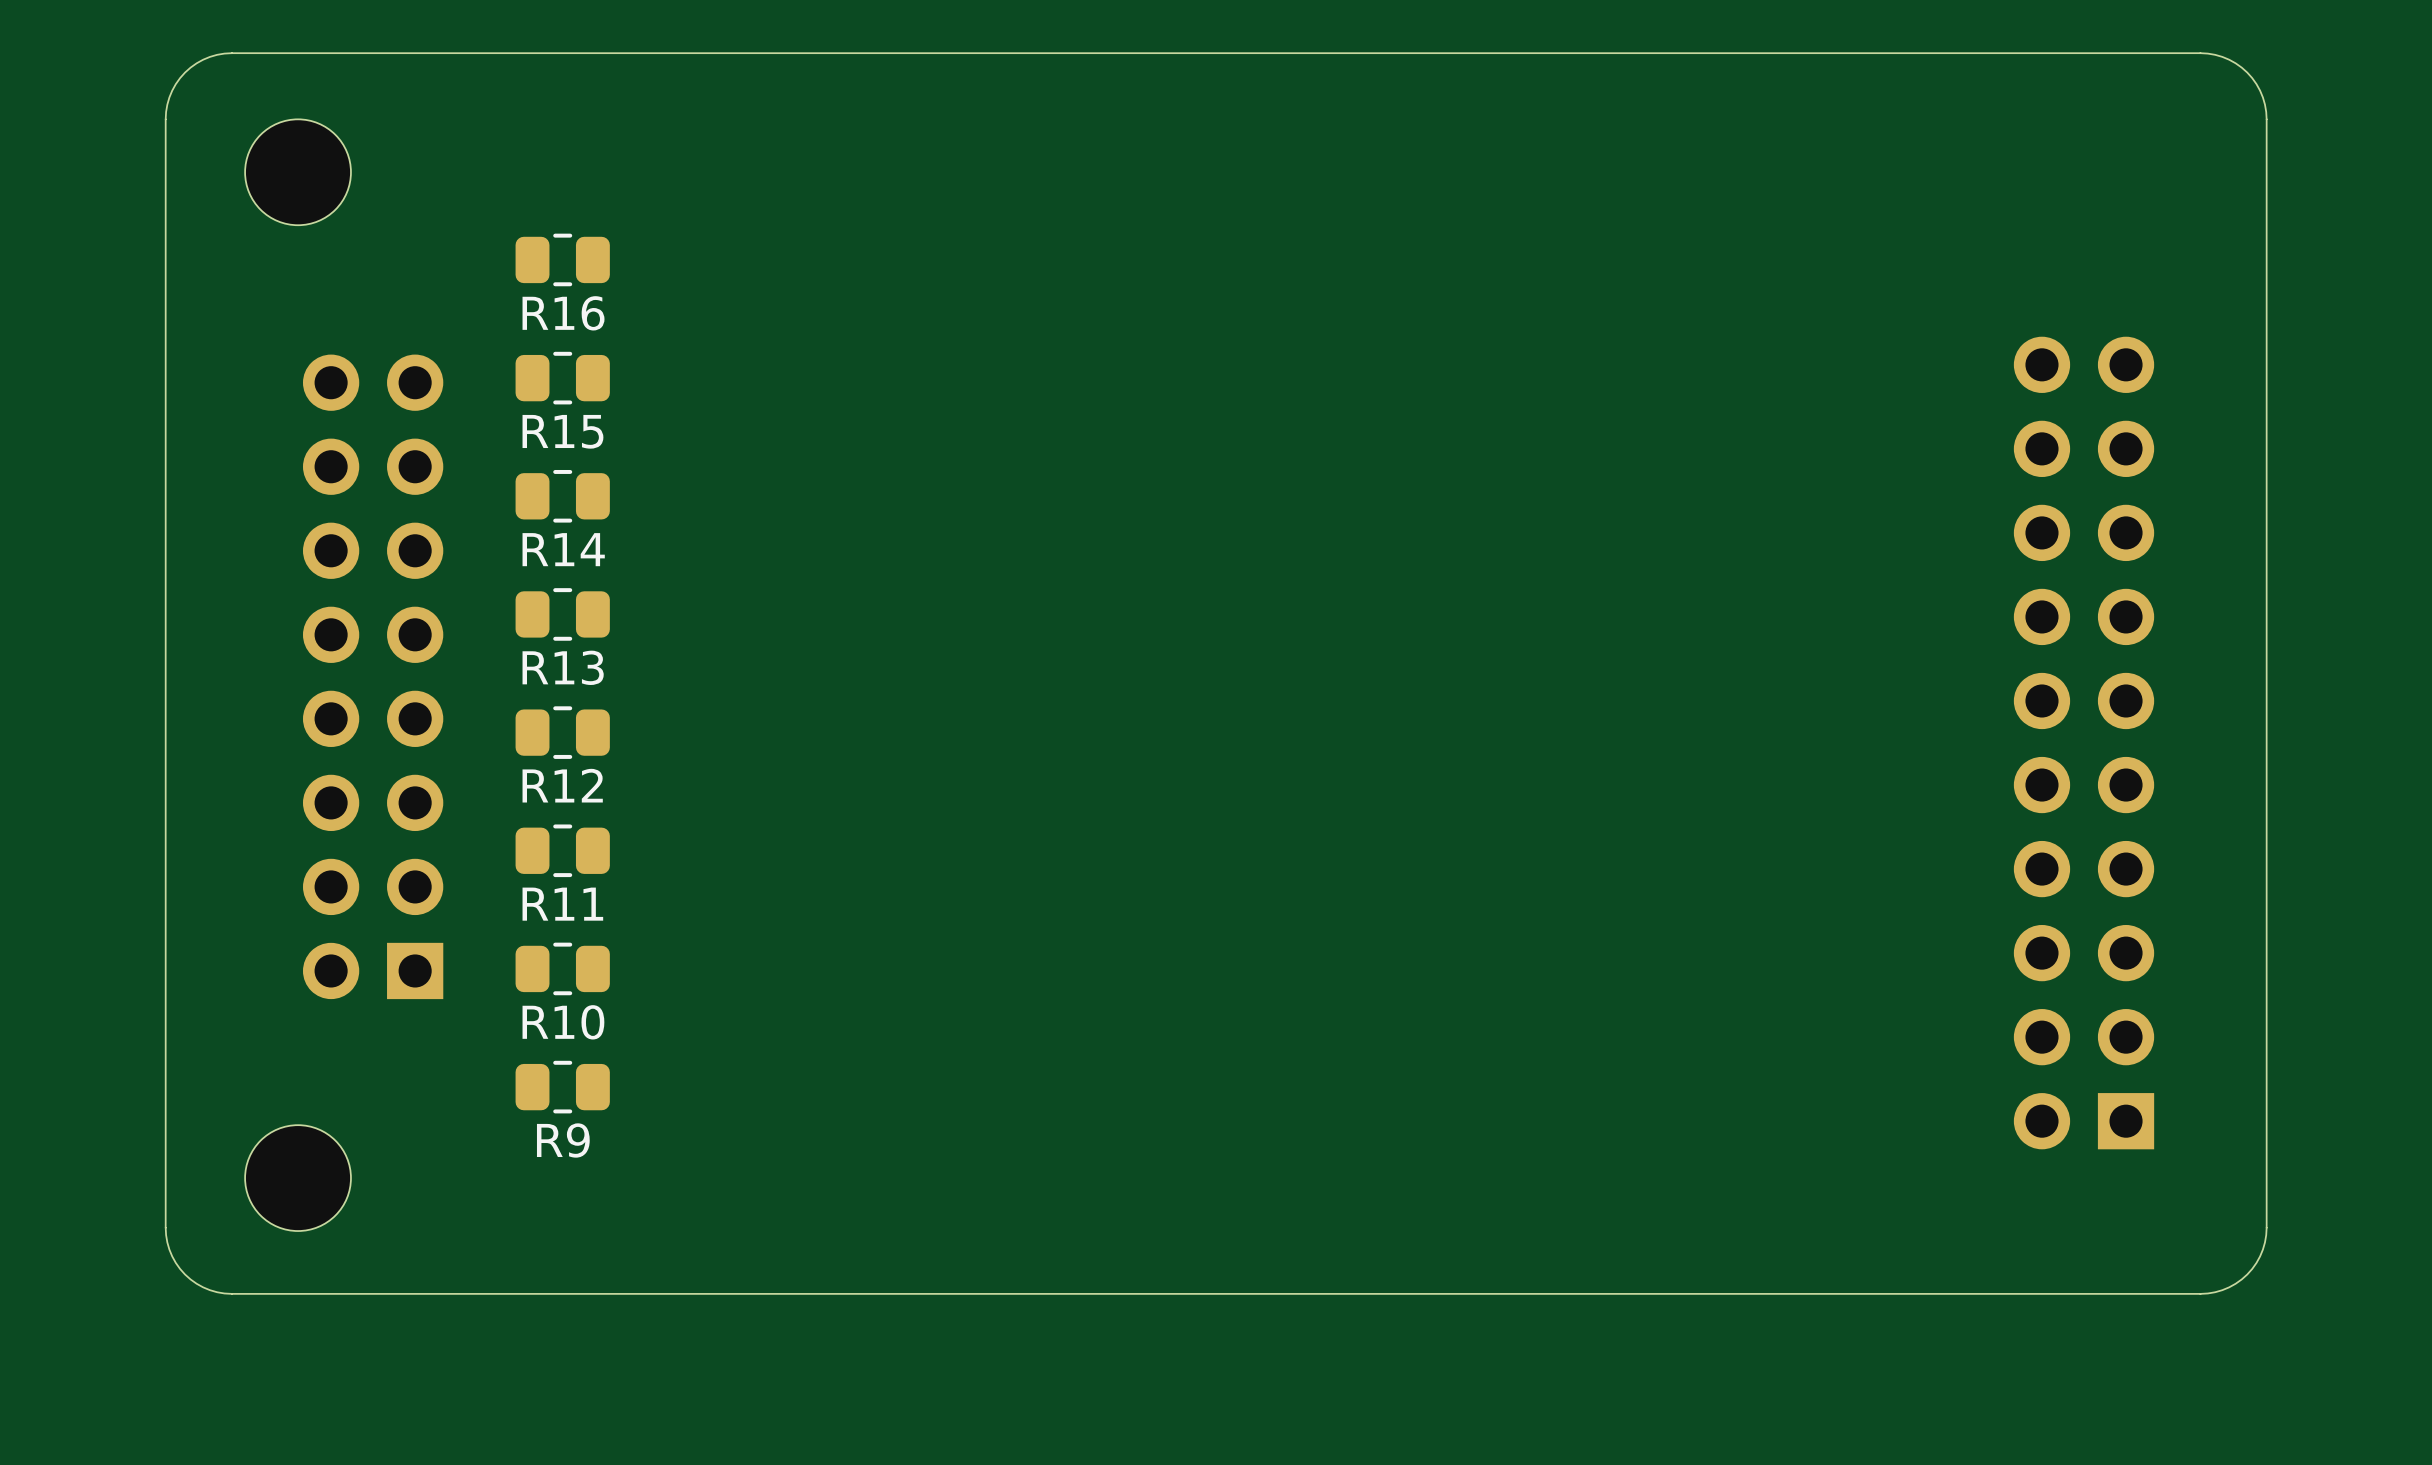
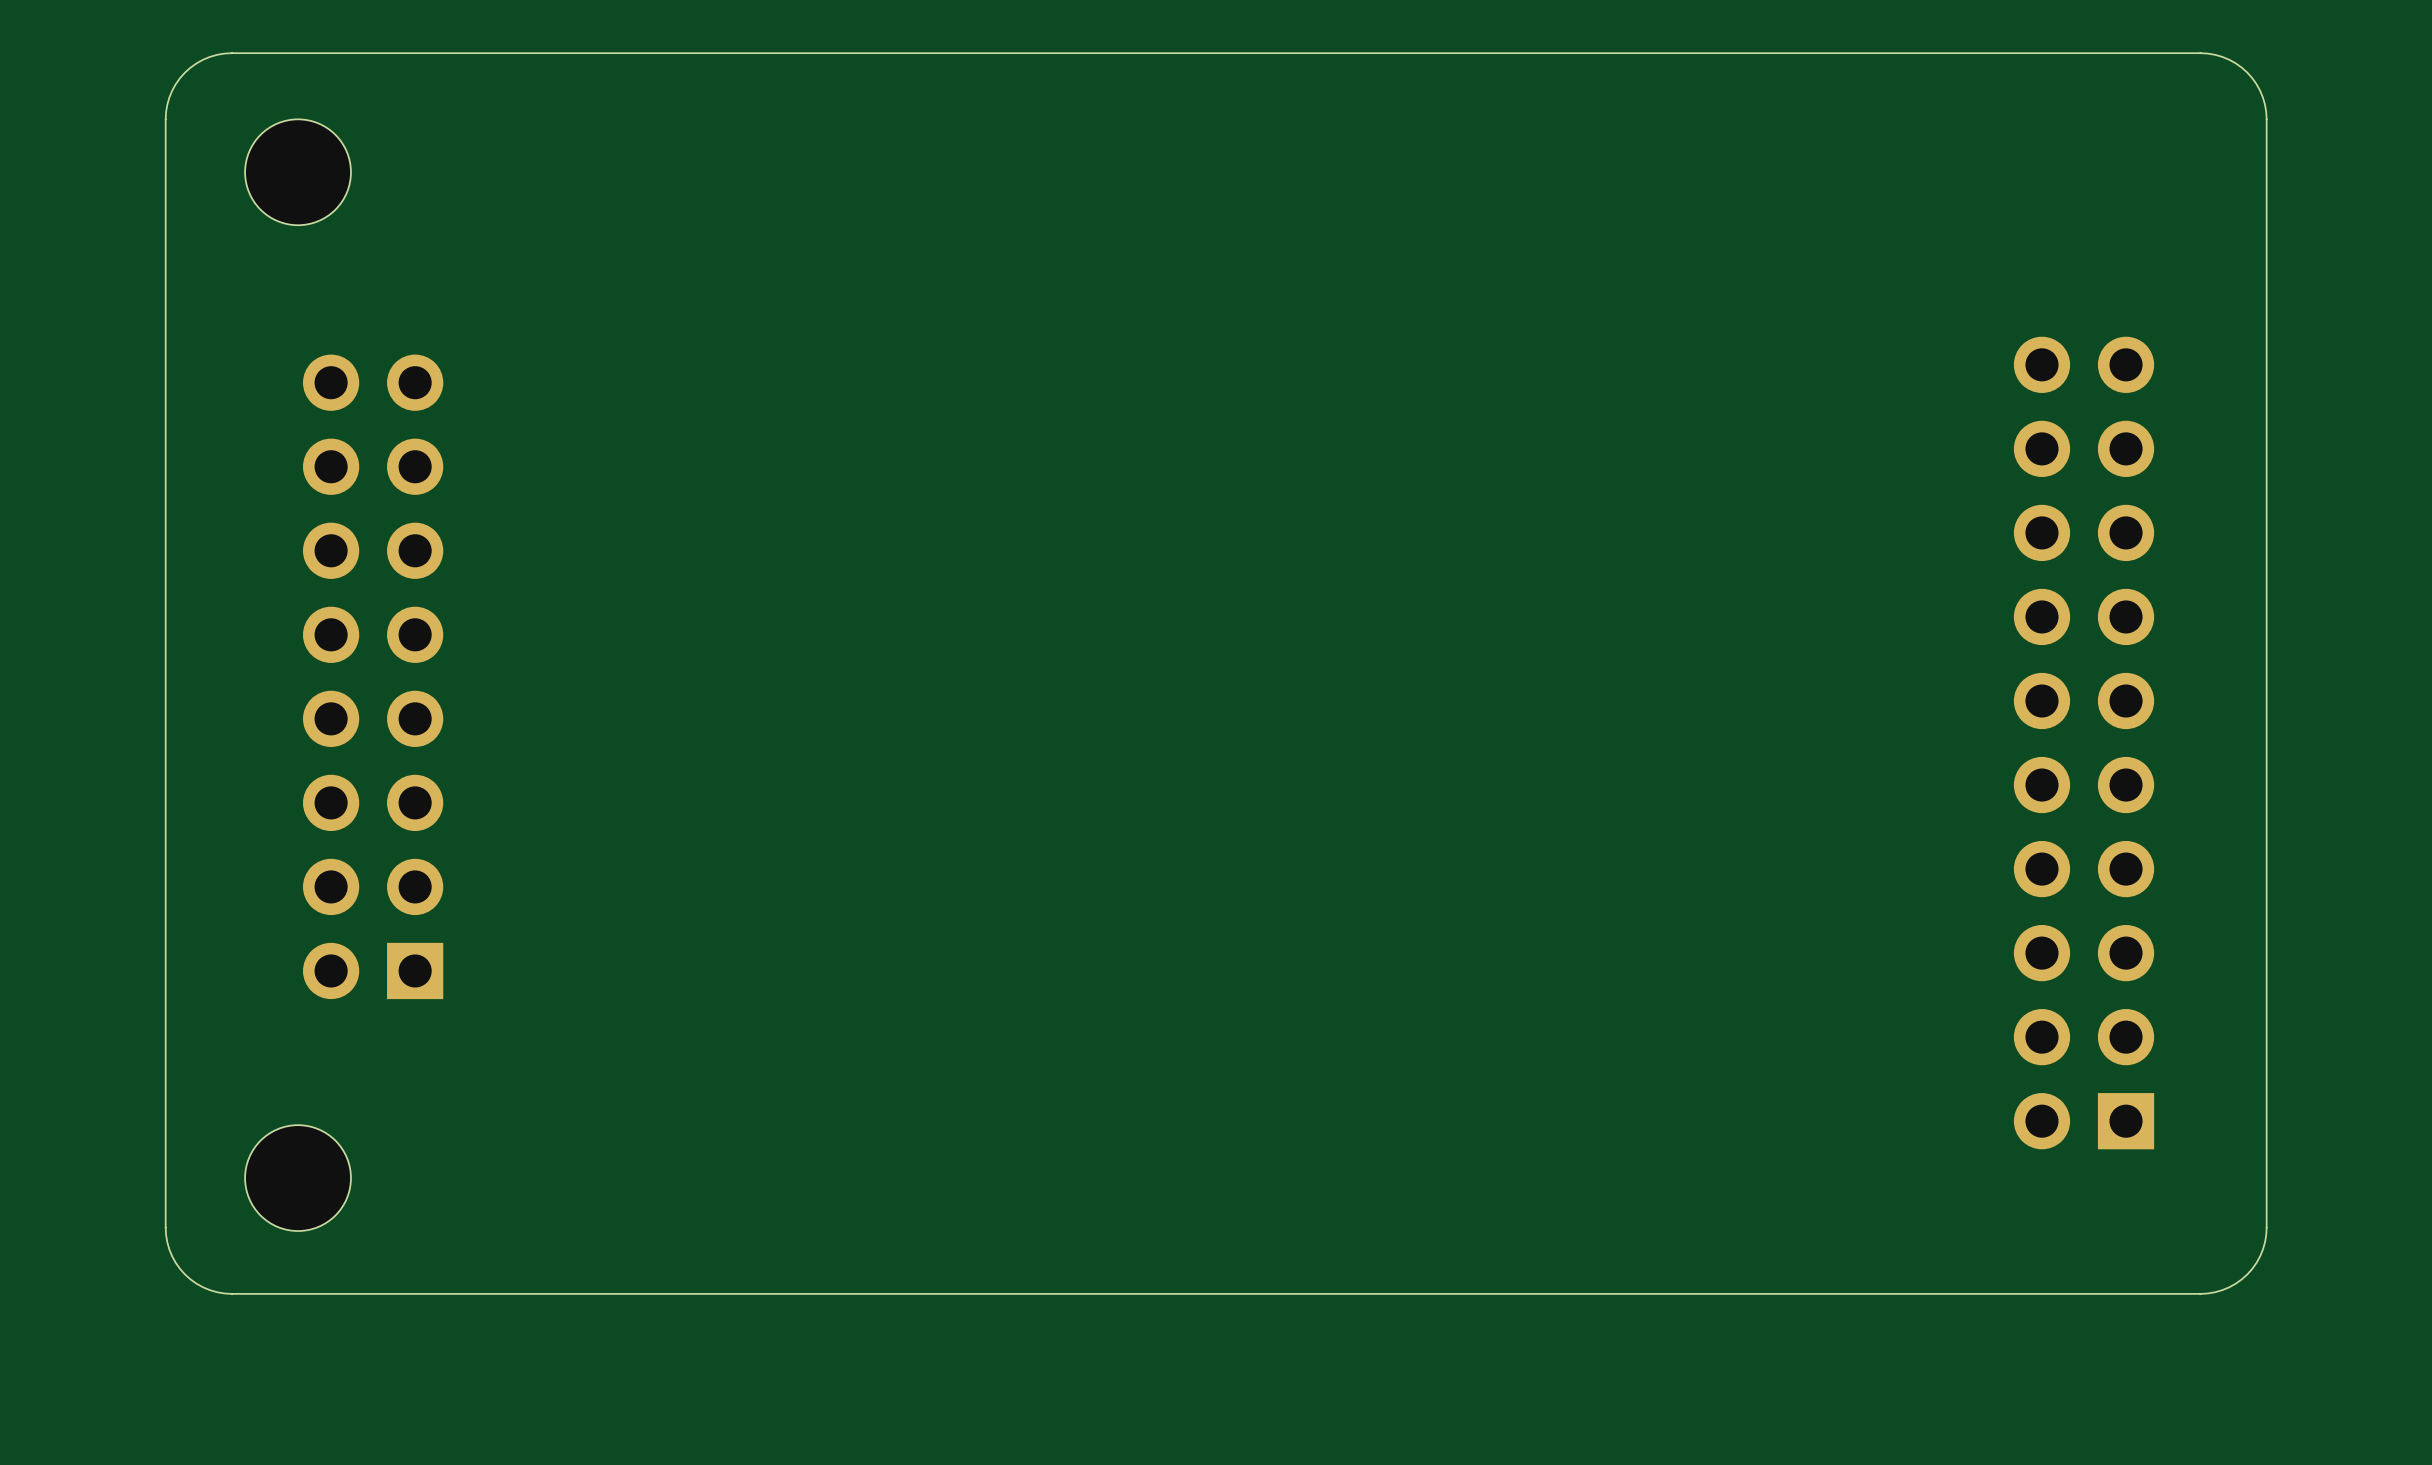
R16: (562, 259) -> none
R15: (562, 378) -> none
R14: (562, 496) -> none
R13: (562, 614) -> none
R12: (562, 732) -> none
R11: (562, 850) -> none
R10: (562, 968) -> none
R9: (562, 1087) -> none

